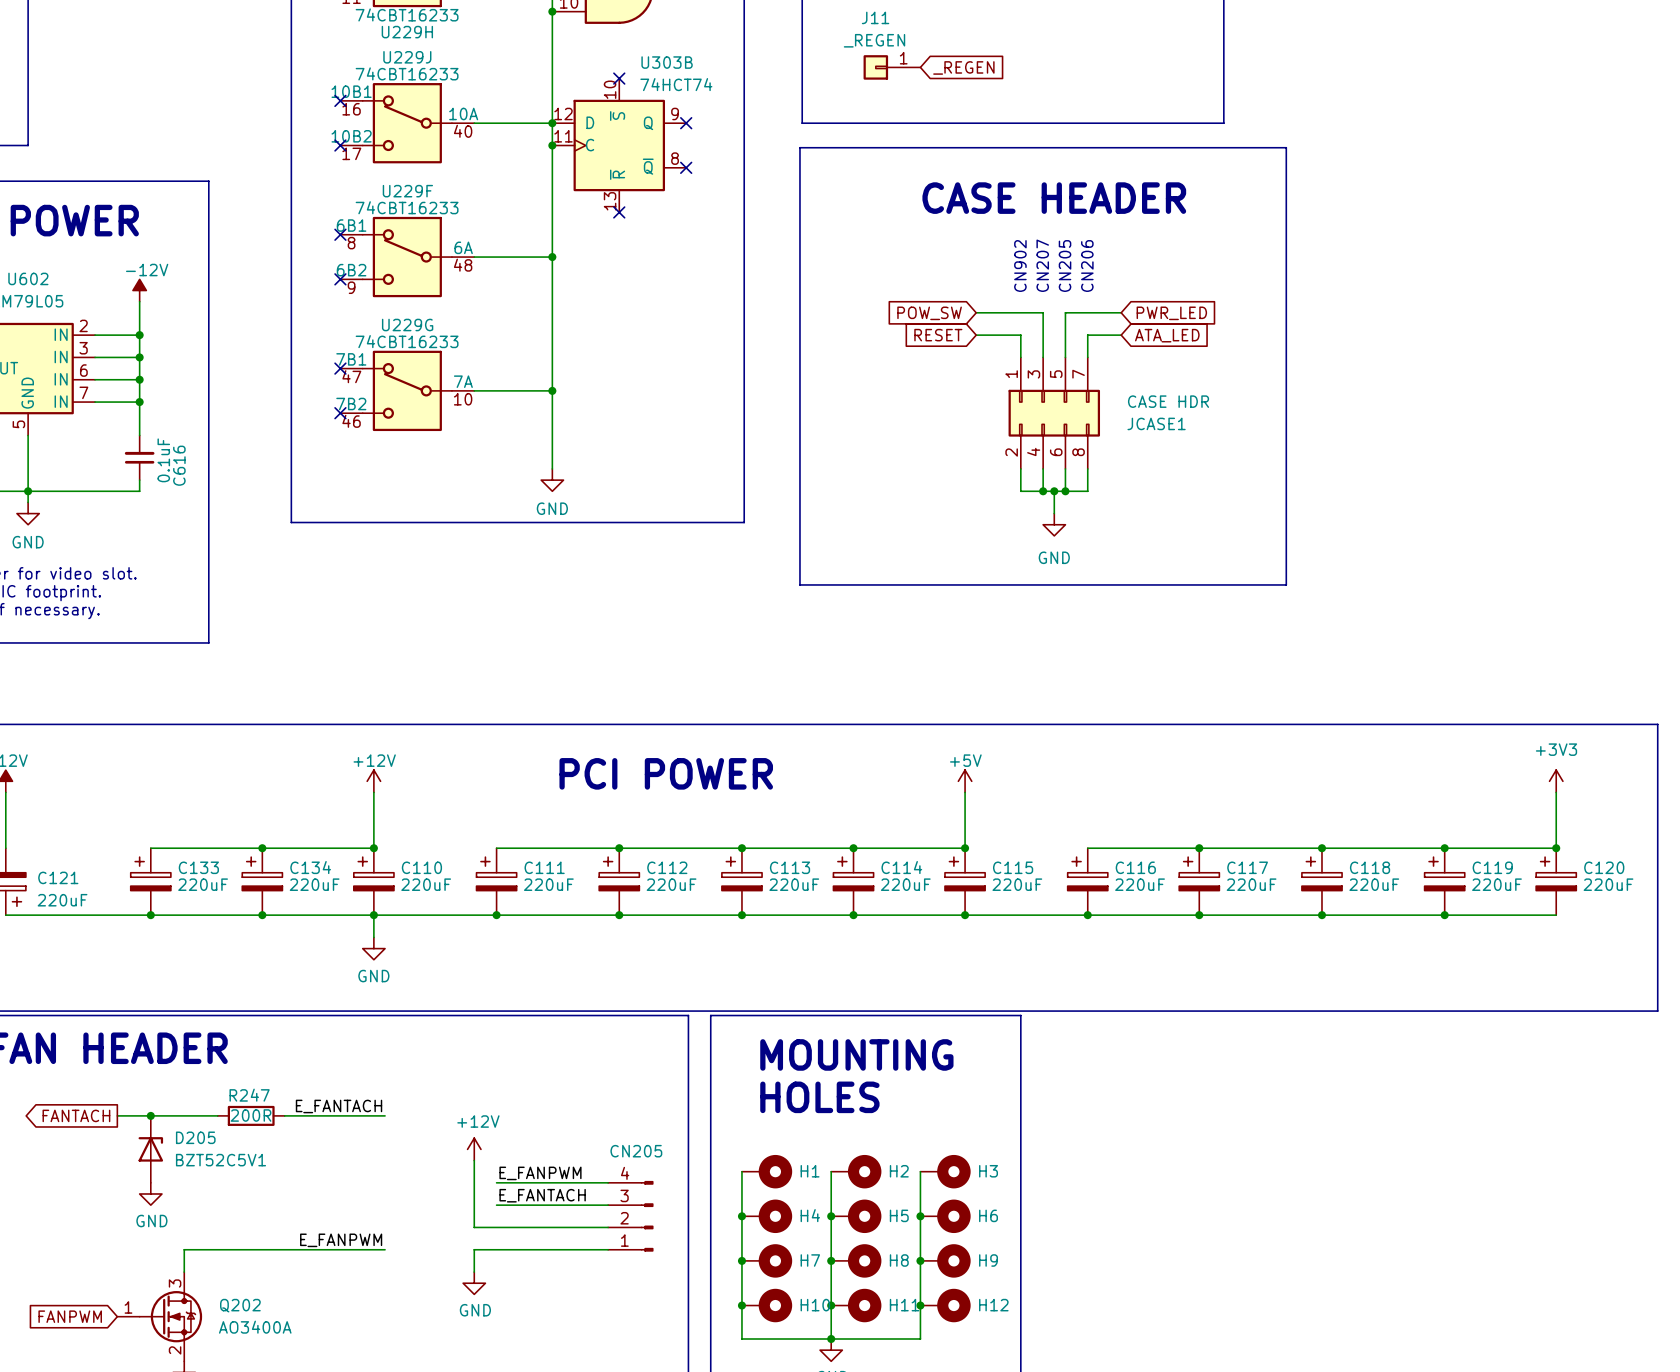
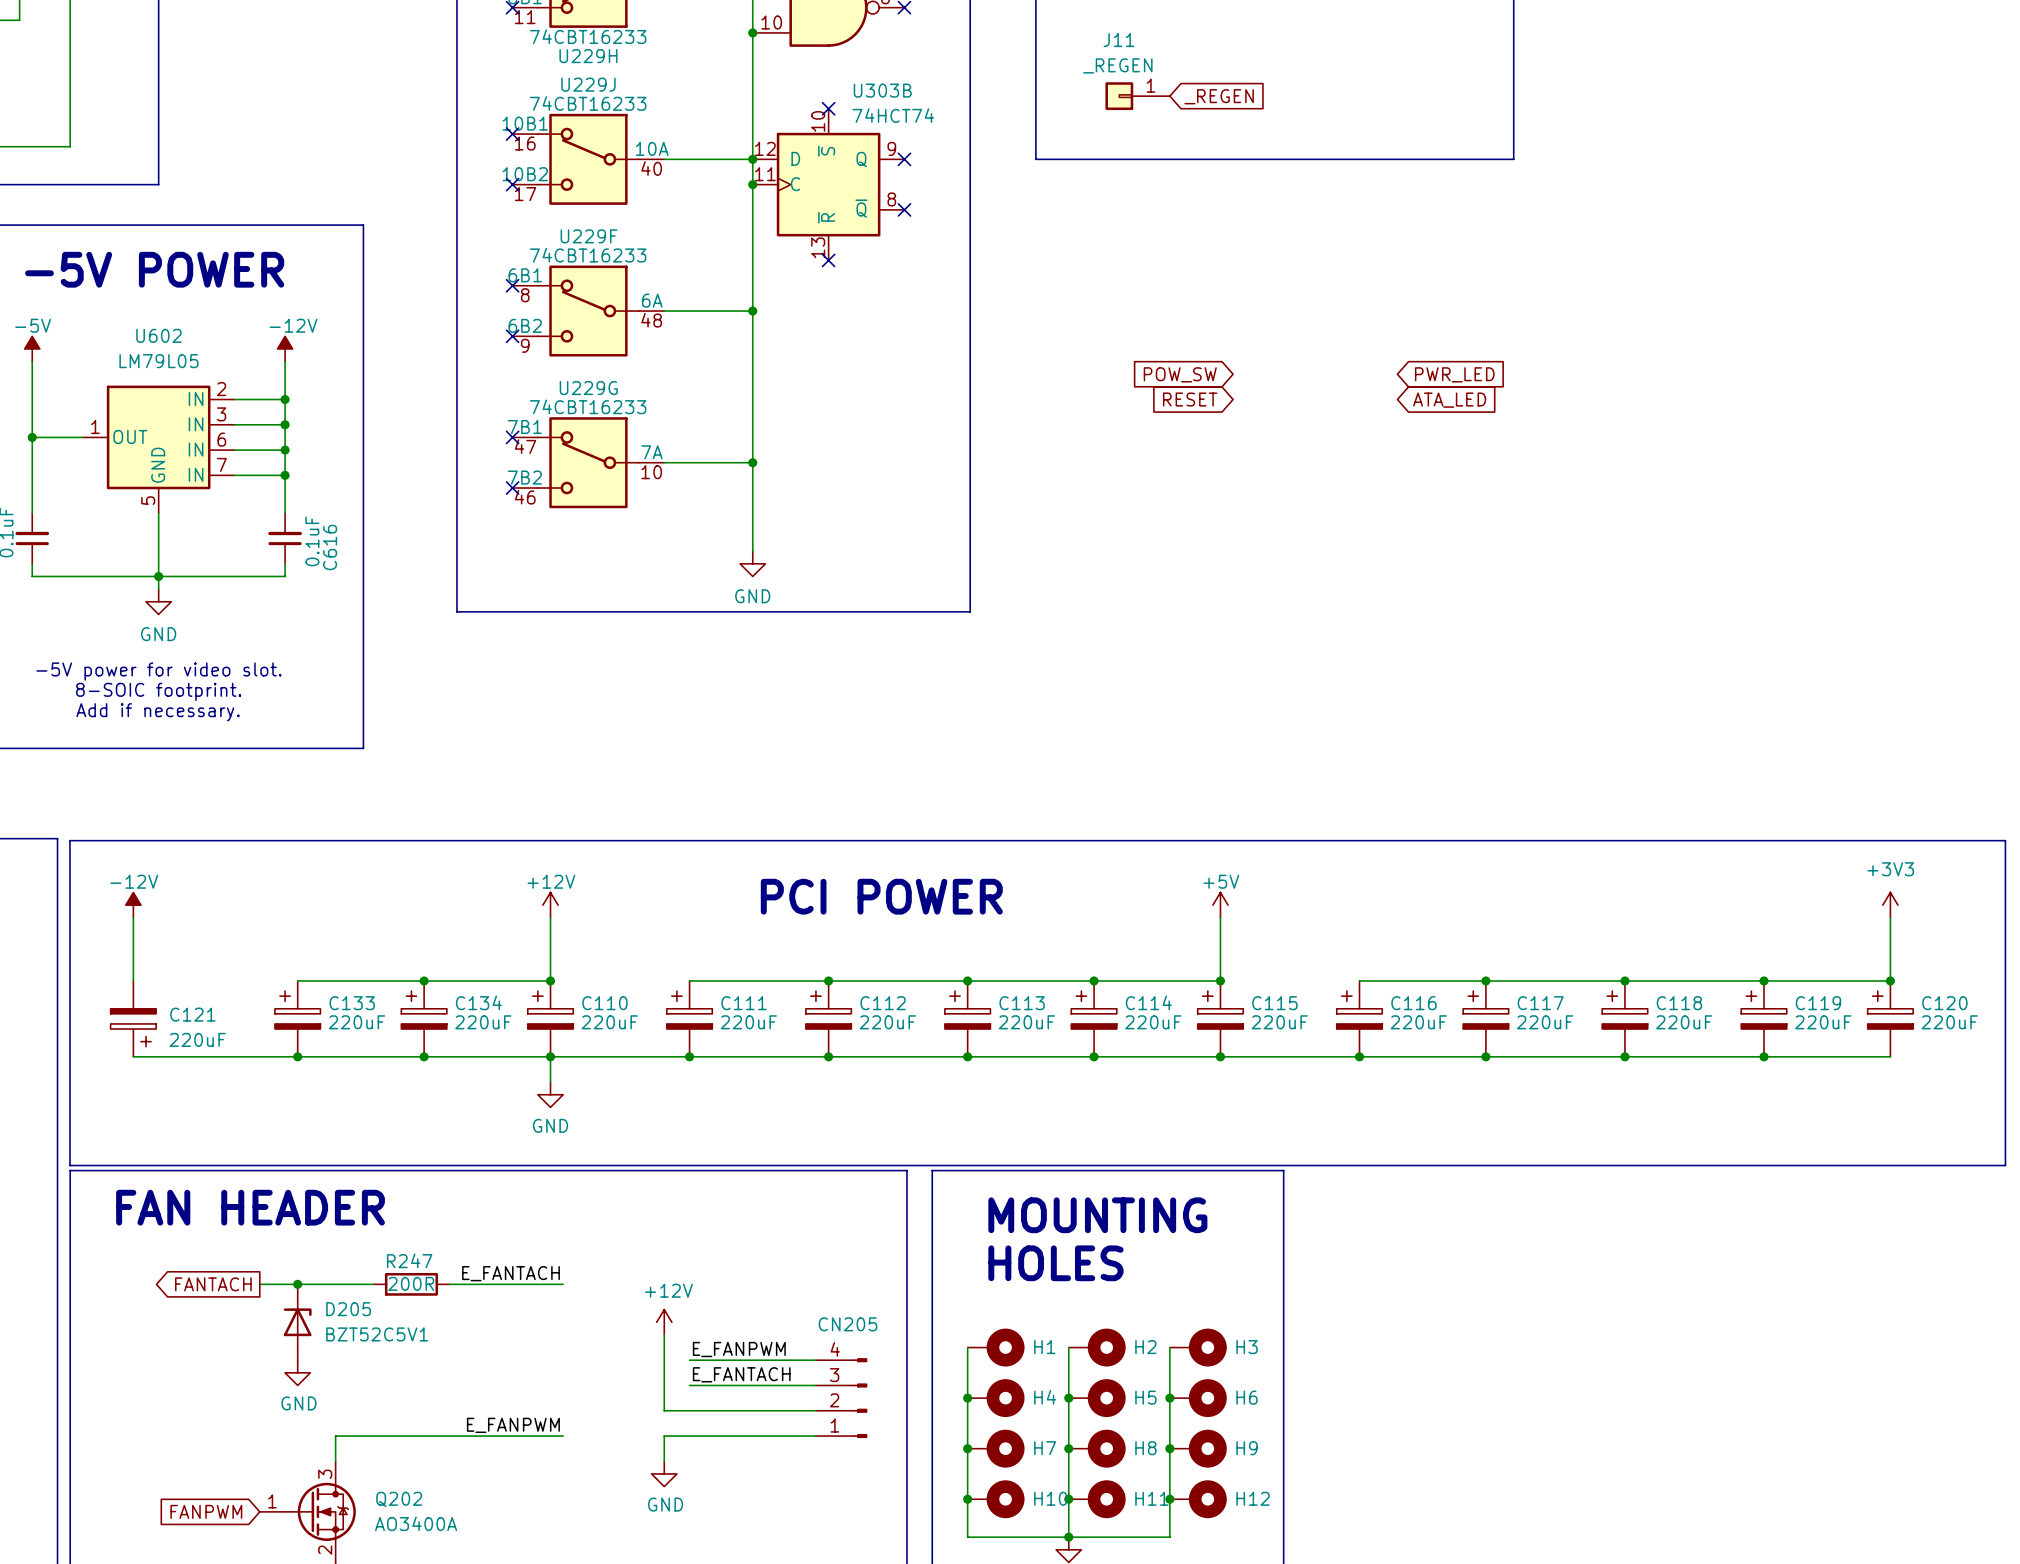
line: (799, 147) (1286, 147) (1286, 584) (799, 584) (799, 147) -> none
text: CASE HEADER (1054, 198) -> none
text: CN207 (1042, 265) -> none
text: CN902 (1020, 266) -> none
text: CN205 (1065, 266) -> none
text: CN206 (1087, 266) -> none
wire: (976, 312) (1043, 312) (1043, 357) -> none
wire: (1121, 312) (1065, 312) (1065, 357) -> none
wire: (976, 335) (1020, 335) (1020, 357) -> none
wire: (1121, 335) (1087, 335) (1087, 357) -> none
JCASE1: CASE HDR (1054, 413) -> none
wire: (1020, 468) (1020, 491) (1087, 491) (1087, 468) -> none
wire: (1043, 468) (1043, 491) -> none
wire: (1065, 468) (1065, 491) -> none
junction: (1043, 491) -> none
wire: (1054, 491) (1054, 513) -> none
junction: (1054, 491) -> none
junction: (1065, 491) -> none
power symbol: GND (1054, 524) -> none

